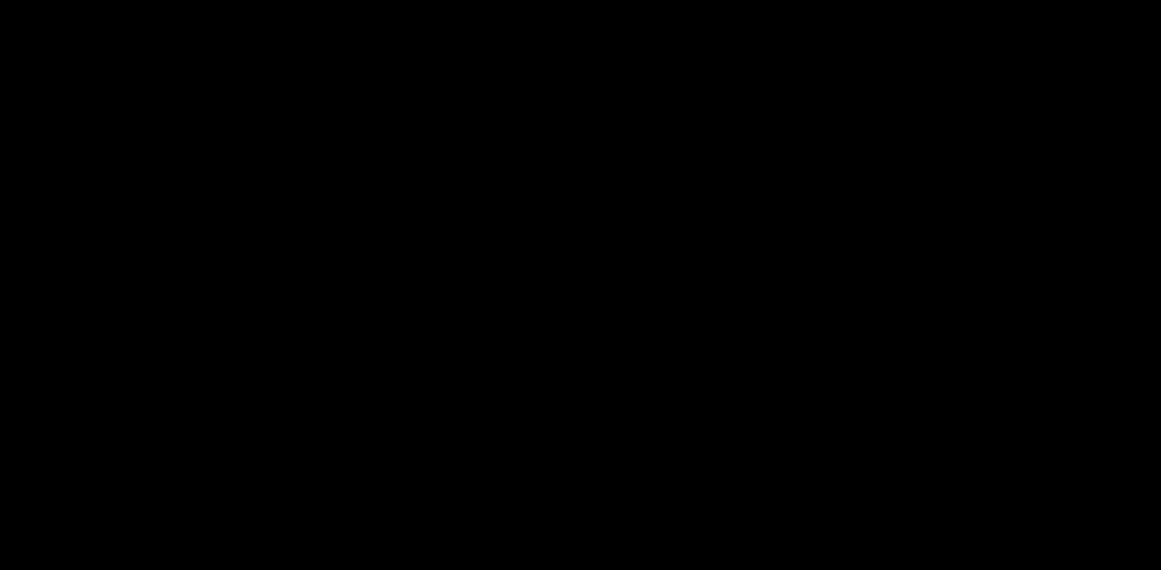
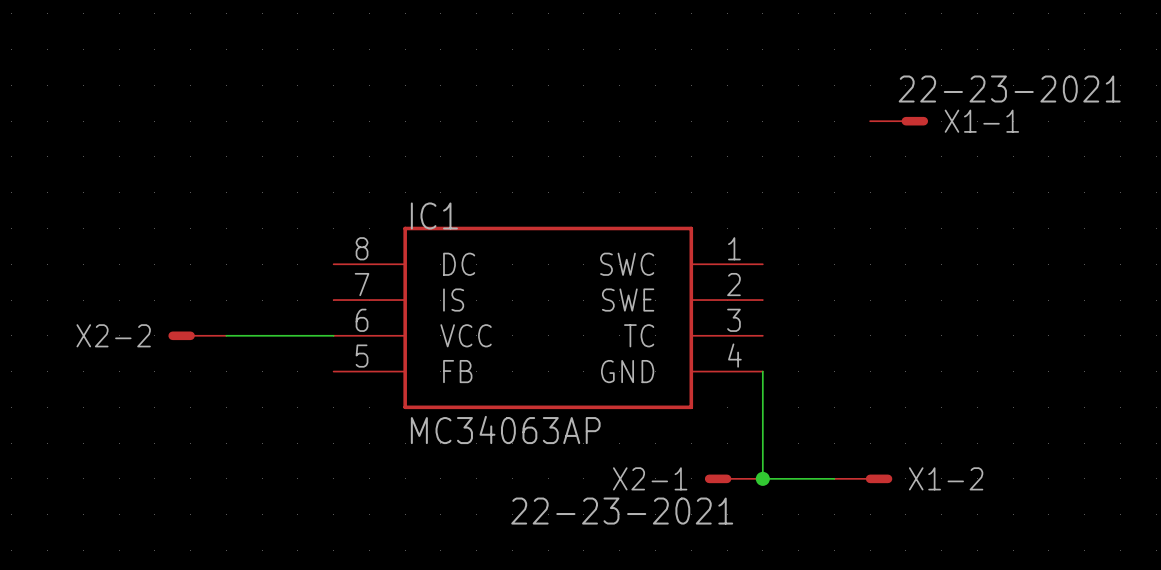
X1-1: none -> 22-23-2021 (899, 121)
IC1: none -> MC34063AP (548, 317)
X2-2: none -> (197, 335)
wire: none -> (226, 335) (333, 335)
wire: none -> (762, 371) (762, 478) (834, 478)
X2-1: none -> 22-23-2021 (733, 478)
junction: none -> (762, 478)
X1-2: none -> (863, 478)

